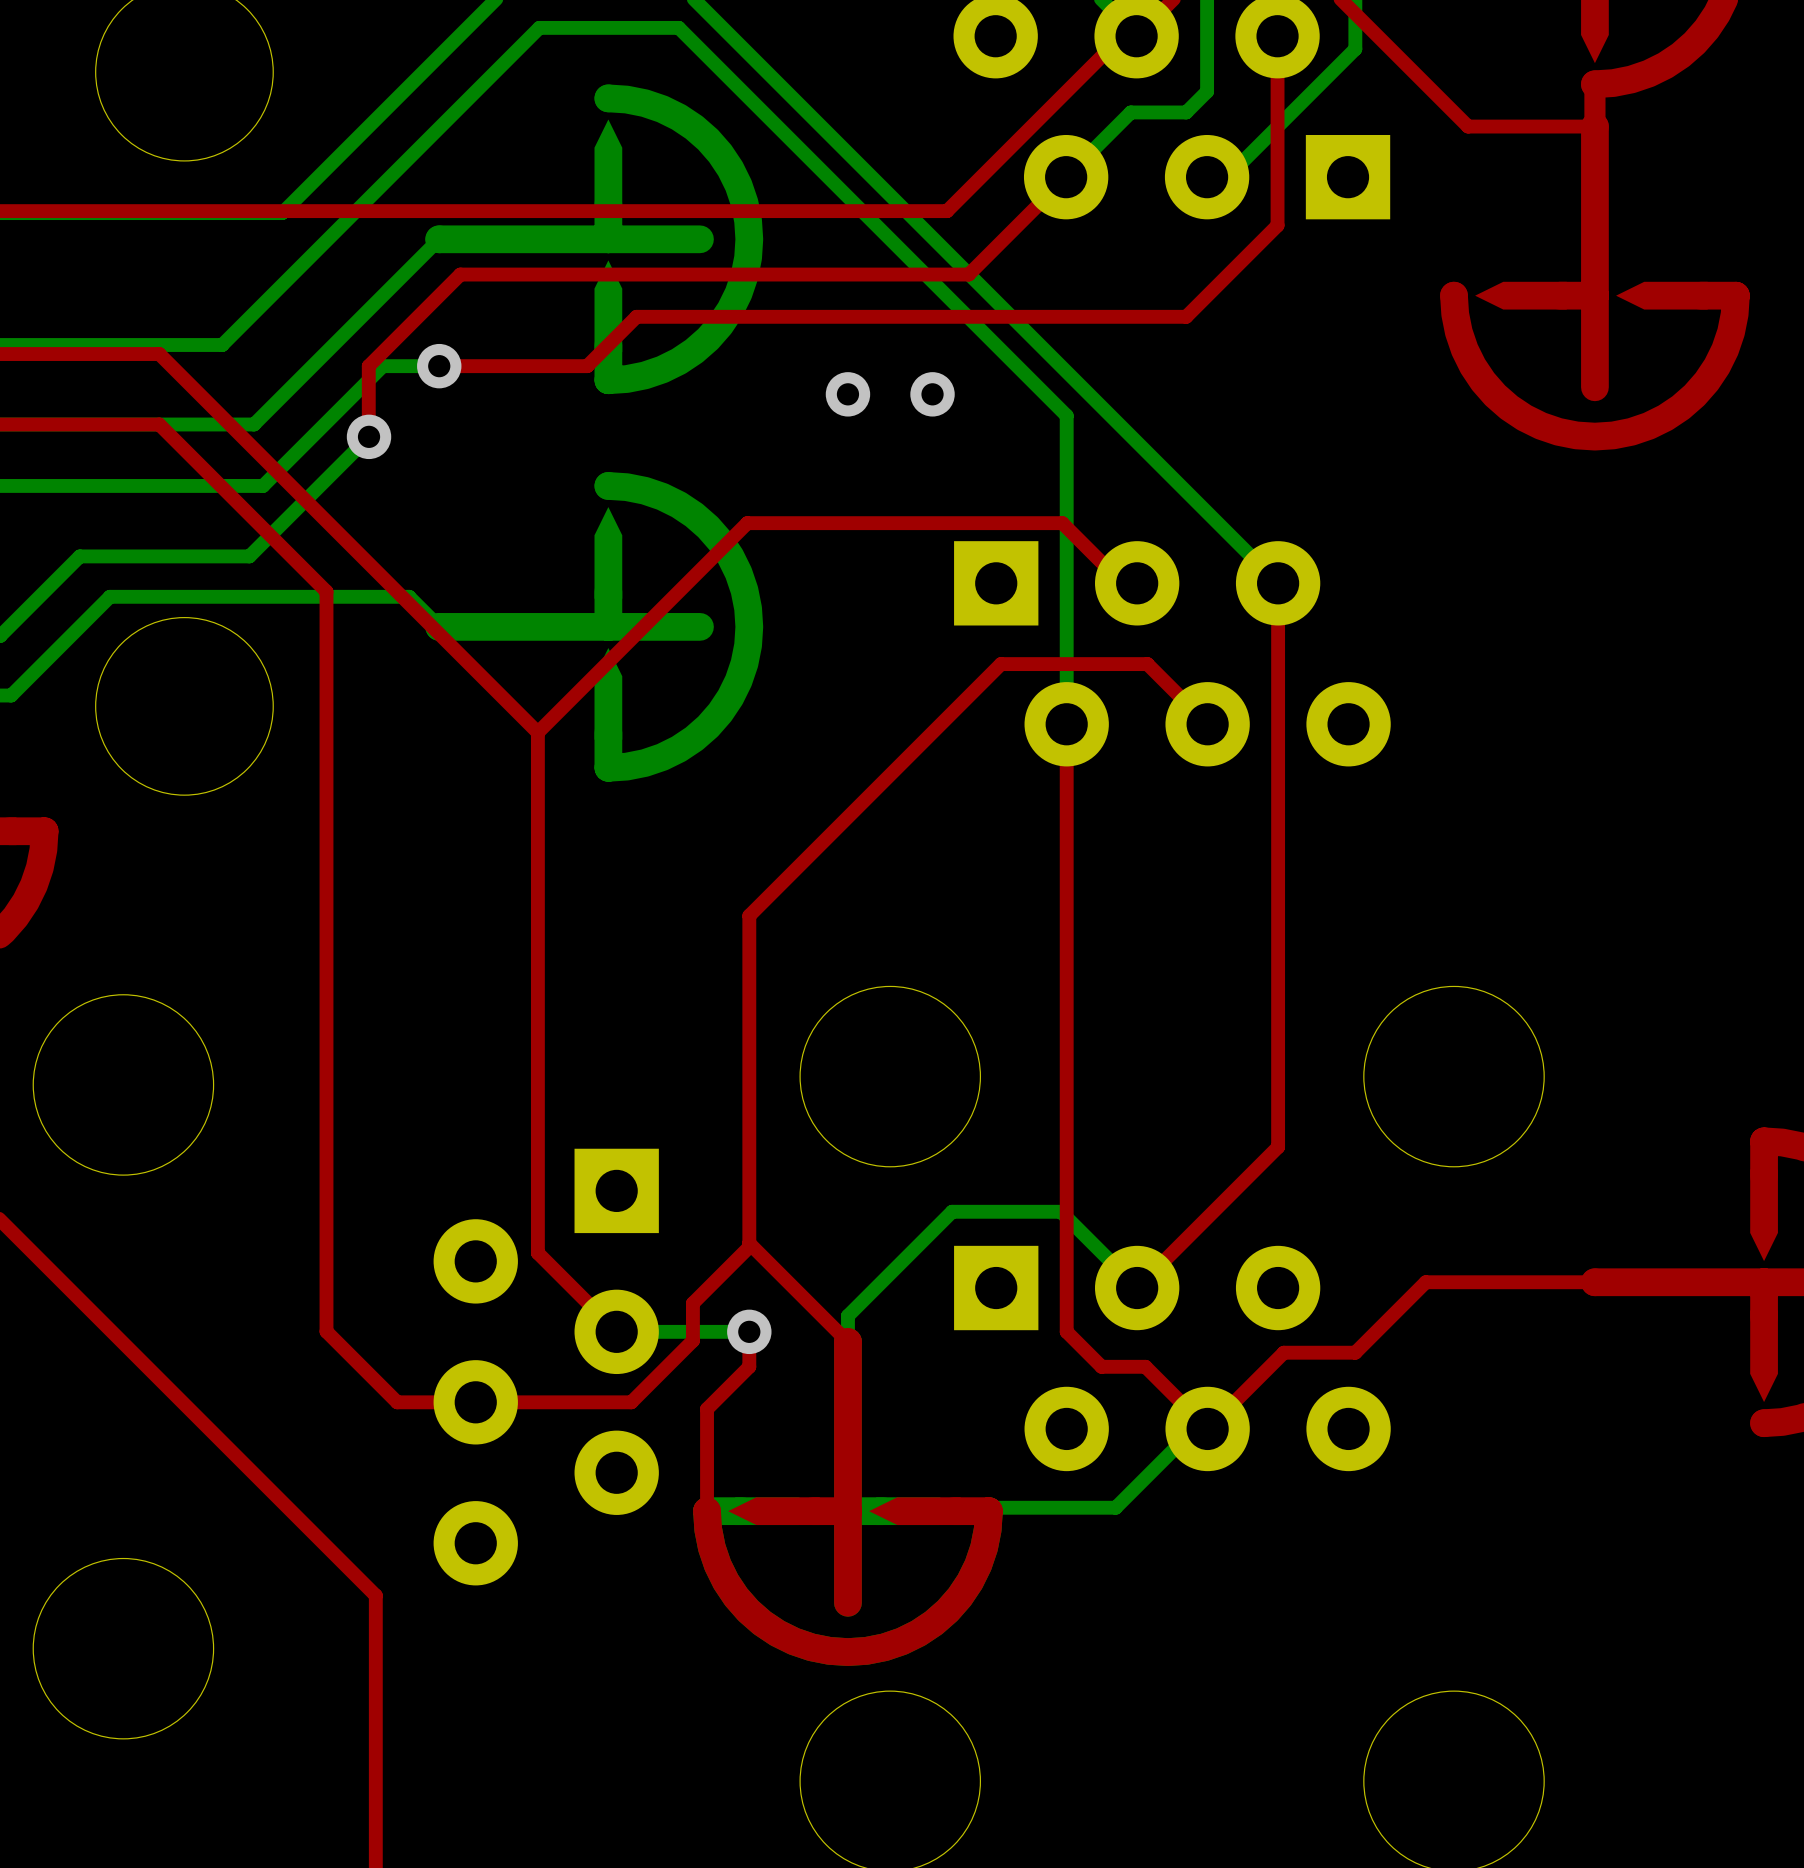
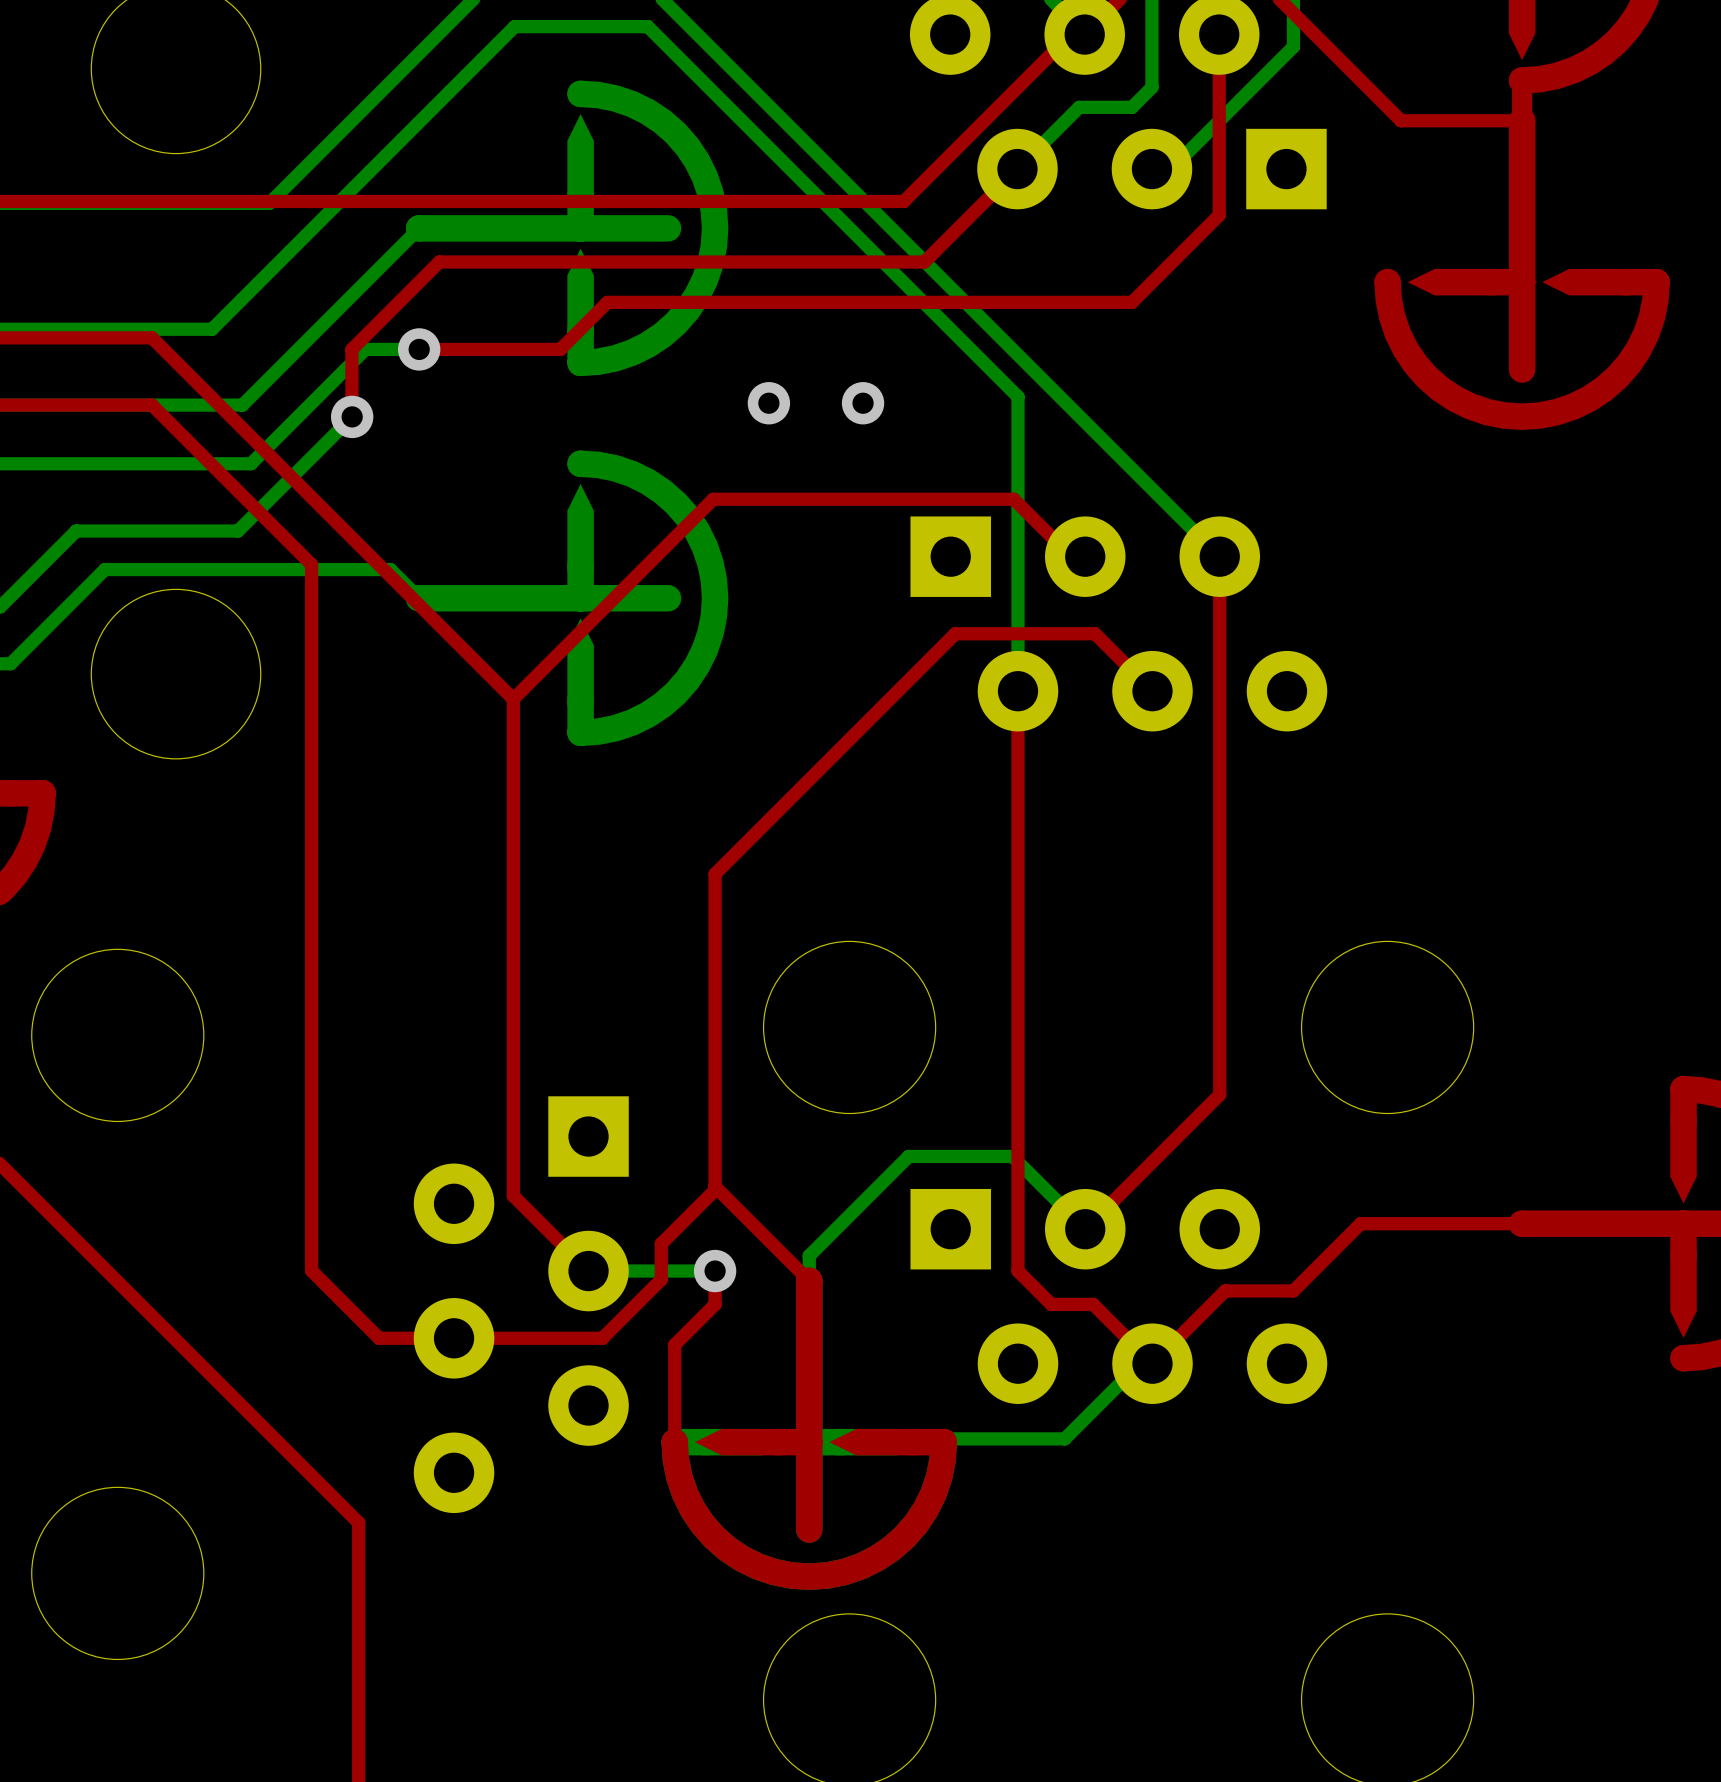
via position: (847, 394) -> (768, 403)
via position: (932, 394) -> (863, 403)

